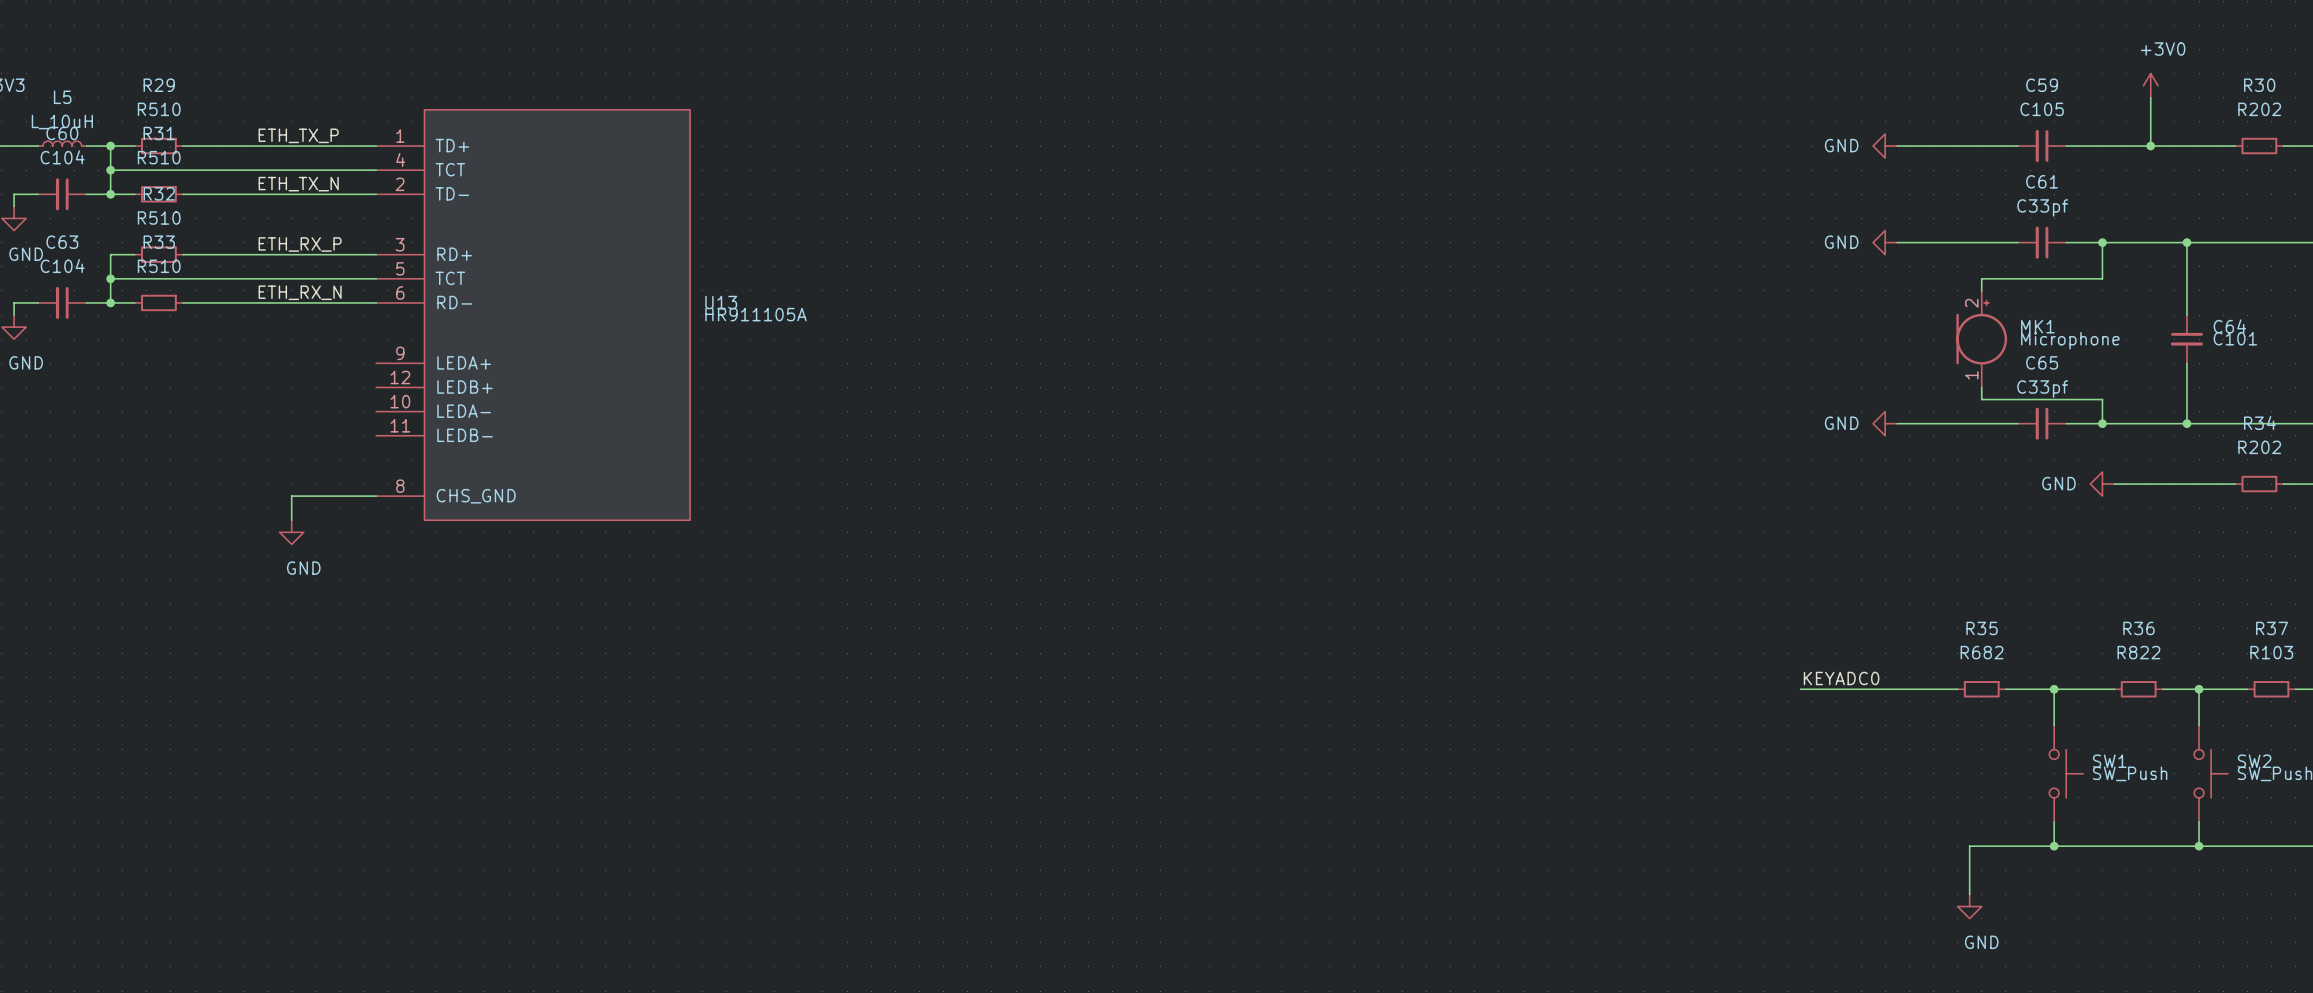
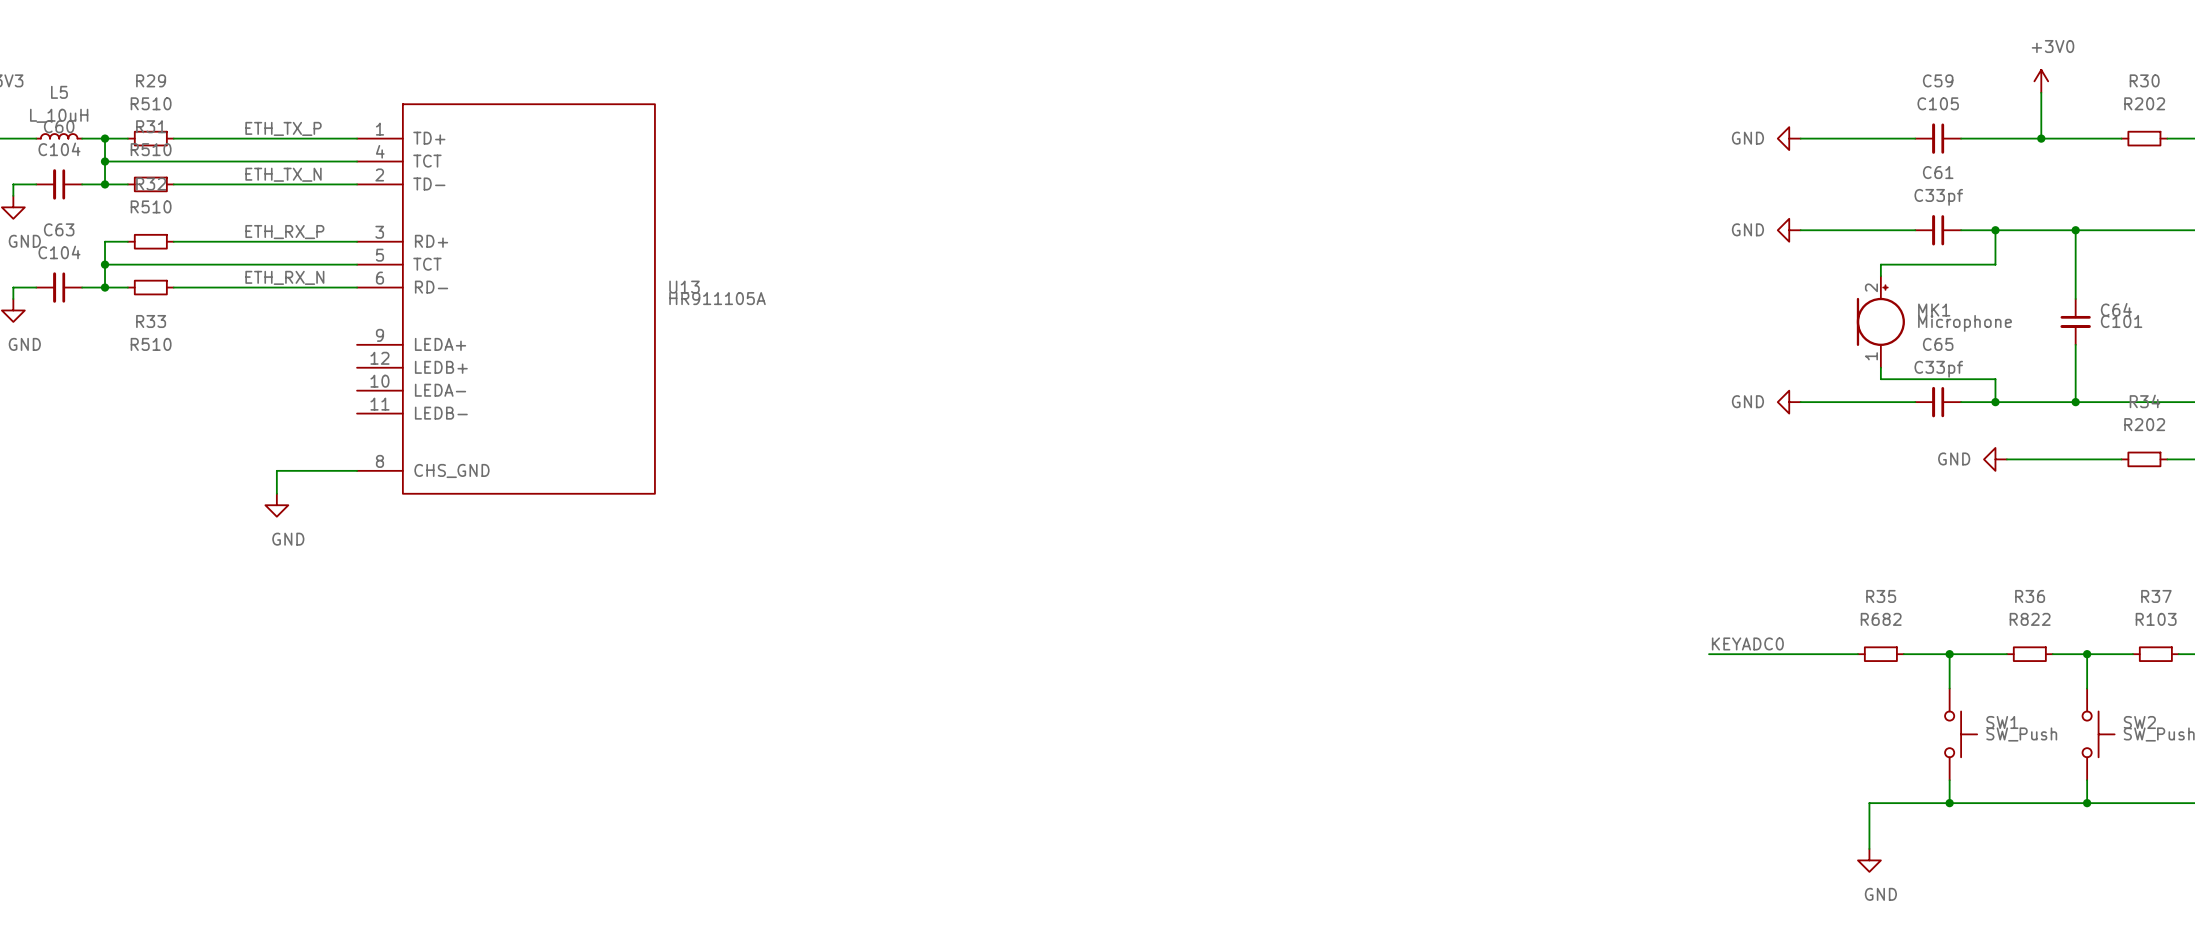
R33 name position: R33 (159, 242) -> R33 (151, 321)
R33 value position: R510 (159, 266) -> R510 (151, 344)

